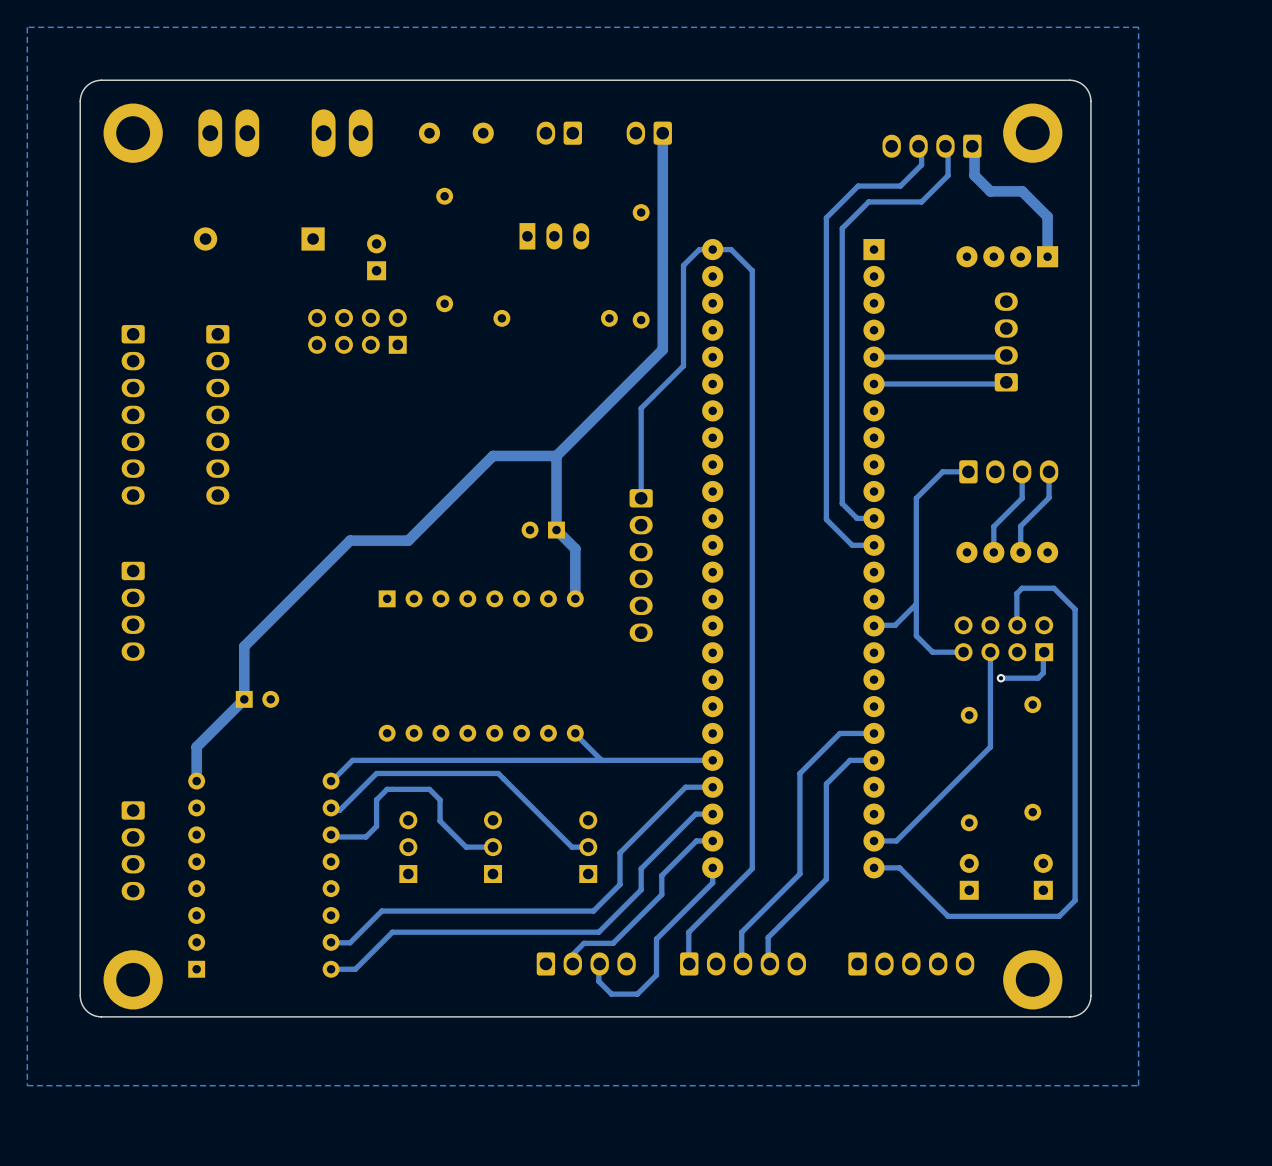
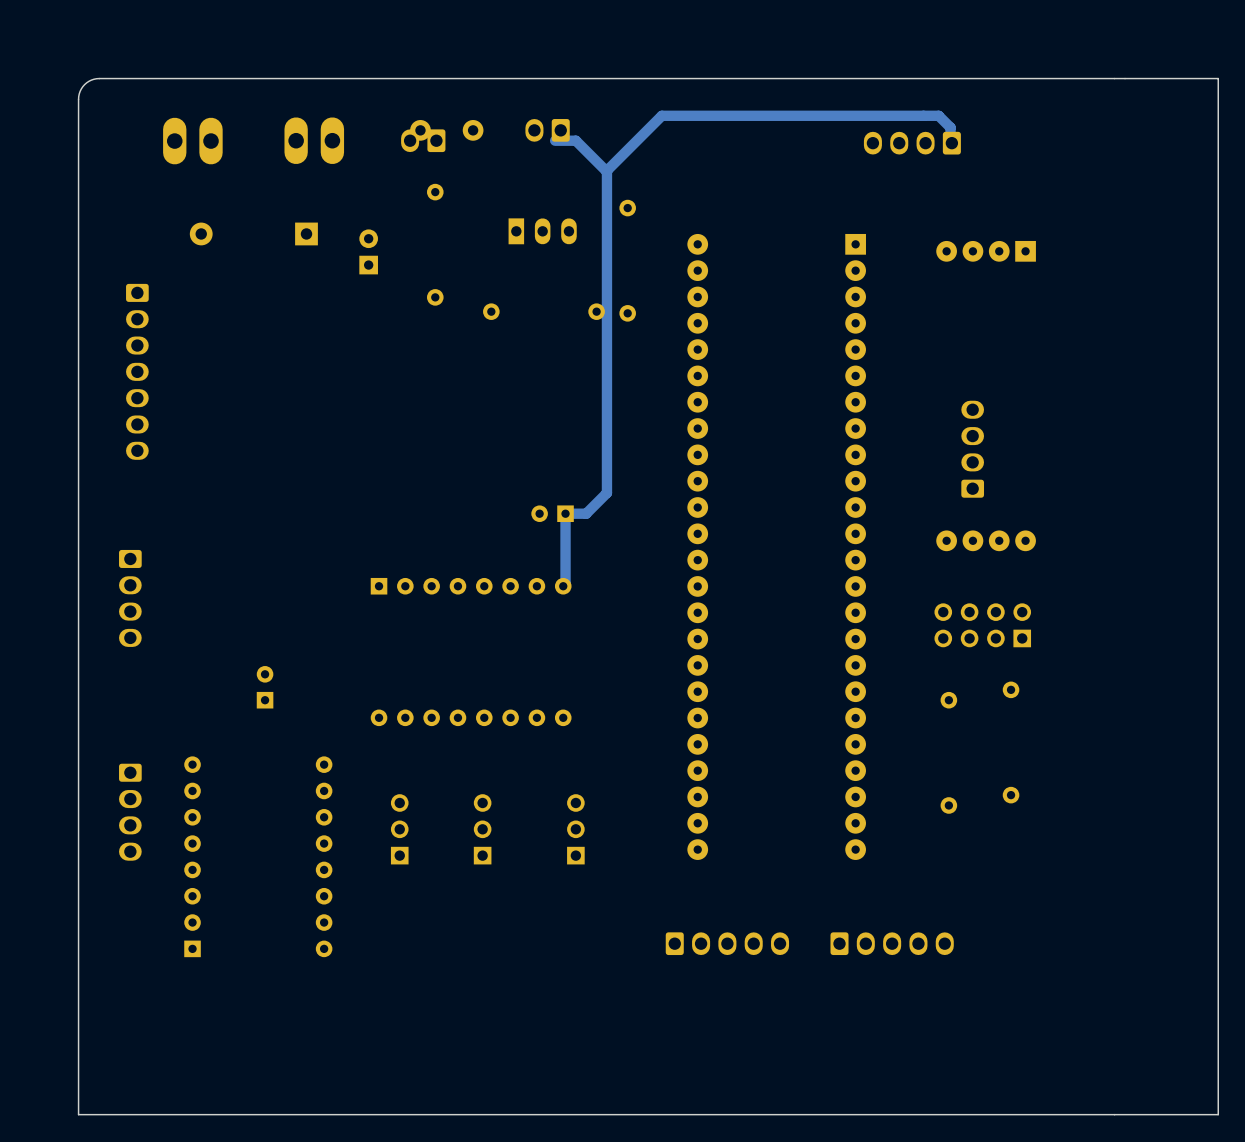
zone outline: (1138, 27) (1138, 1085) (27, 1085) (27, 27) (1138, 27) -> none
board edge: (1069, 80) (1077, 81) (1084, 86) (1089, 93) (1090, 101) (1090, 995) (1089, 1003) (1084, 1010) (1077, 1015) (1069, 1016) (101, 1016) (93, 1015) (86, 1010) (81, 1003) (80, 995) -> (1047, 78) (1218, 78) (1218, 1114) (78, 1114) (78, 974)
part: (133, 133) -> none
part position: (228, 133) -> (192, 141)
part position: (342, 133) -> (314, 140)
part position: (649, 133) -> (423, 140)
track: (662, 133) (662, 349) (556, 455) -> none
part: (1032, 133) -> none
track: none -> (555, 140) (575, 140) (606, 171)
track: (921, 149) (921, 164) (900, 186) (858, 186) (826, 217) (826, 519) (852, 545) (874, 545) -> none
track: (948, 149) (948, 175) (921, 201) (868, 201) (842, 228) (842, 503) (857, 518) (874, 518) -> none
track: (974, 149) (974, 175) (990, 191) (1022, 191) (1047, 216) (1047, 256) -> none
part: (357, 331) -> none
part: (1006, 341) -> none
track: (1009, 357) (874, 357) -> none
track: (1009, 383) (874, 383) -> none
part position: (133, 414) -> (137, 371)
part: (217, 414) -> none
track: (556, 455) (556, 530) (575, 548) (575, 598) -> (950, 143) (950, 127) (938, 115) (661, 115) (606, 170) (606, 492) (586, 513) (565, 513) (565, 583) (563, 586)
track: (556, 455) (493, 455) (408, 540) (350, 540) (244, 646) (244, 699) (196, 747) (196, 781) -> none
track: (1022, 466) (1022, 498) (993, 526) (993, 552) -> none
track: (968, 471) (942, 471) (916, 498) (916, 635) (932, 652) (963, 652) -> none
part rotation: 0° (1008, 471) -> 90° counterclockwise (972, 449)
track: (1049, 471) (1049, 497) (1020, 526) (1020, 552) -> none
track: (641, 498) (641, 408) (683, 366) (683, 265) (699, 249) (731, 249) (752, 270) (752, 868) (688, 932) (688, 963) -> none
part position: (543, 530) -> (552, 513)
part: (641, 565) -> none
track: (916, 604) (895, 625) (874, 625) -> none
track: (1016, 630) (1016, 593) (1022, 588) (1053, 588) (1075, 609) (1075, 900) (1059, 916) (948, 916) (899, 867) (874, 867) -> none
track: (990, 646) (990, 747) (896, 840) (874, 840) -> none
track: (1043, 651) (1043, 672) (1038, 678) (1001, 678) -> none
via: (1001, 678) -> none
part rotation: 0° (257, 699) -> 90° counterclockwise (265, 687)
track: (874, 733) (839, 733) (799, 773) (799, 874) (741, 932) (741, 969) -> none
track: (577, 736) (601, 760) -> none
track: (712, 760) (352, 760) (328, 784) -> none
track: (874, 760) (850, 760) (826, 784) (826, 879) (768, 937) (768, 963) -> none
track: (712, 787) (685, 787) (620, 852) (620, 884) (593, 911) (381, 911) (350, 942) (328, 942) -> none
track: (328, 810) (339, 810) (376, 773) (498, 773) (571, 847) (588, 847) -> none
track: (712, 814) (695, 814) (641, 868) (641, 889) (598, 932) (392, 932) (355, 969) (328, 969) -> none
track: (328, 836) (366, 836) (376, 826) (376, 799) (387, 789) (429, 789) (440, 799) (440, 821) (466, 847) (493, 847) -> none
track: (712, 840) (696, 840) (661, 875) (661, 894) (613, 943) (584, 943) (571, 955) (571, 968) -> none
part position: (133, 850) -> (130, 812)
track: (712, 867) (712, 882) (656, 939) (656, 975) (637, 994) (611, 994) (598, 981) (598, 961) -> none
part: (969, 876) -> none
part: (1043, 876) -> none
part: (586, 963) -> none
part: (133, 979) -> none
part: (1032, 979) -> none

